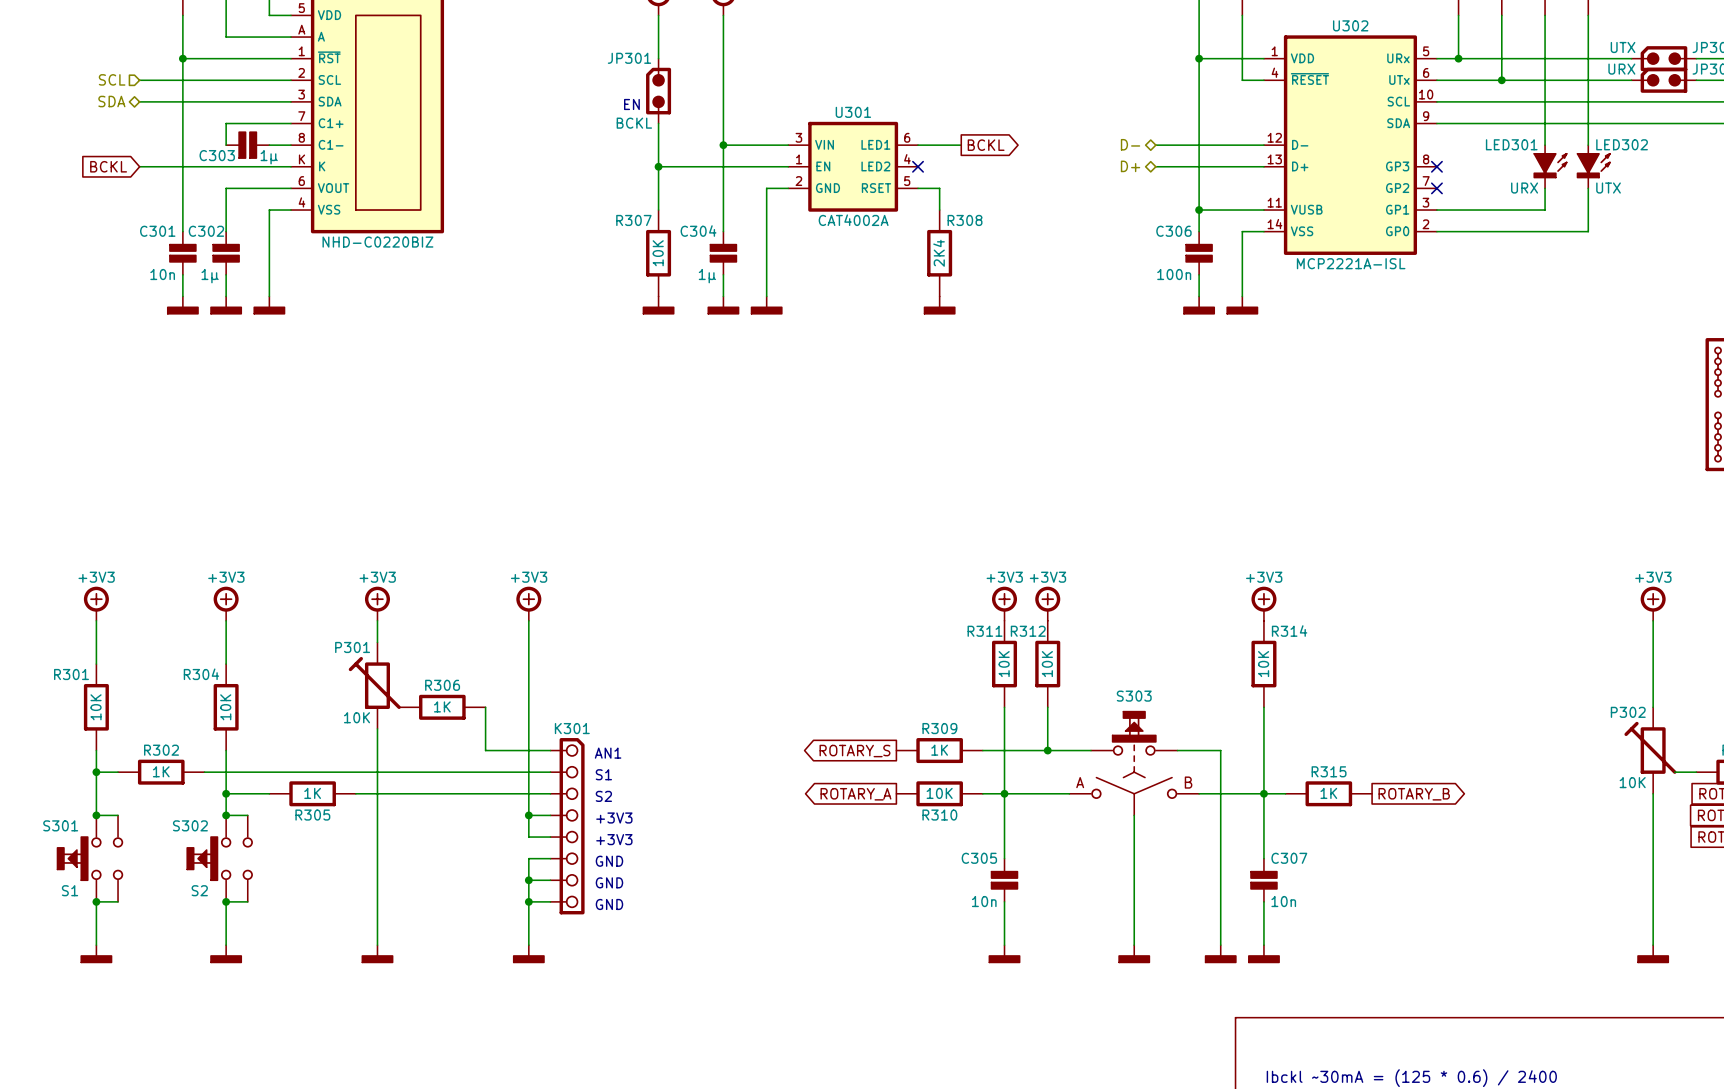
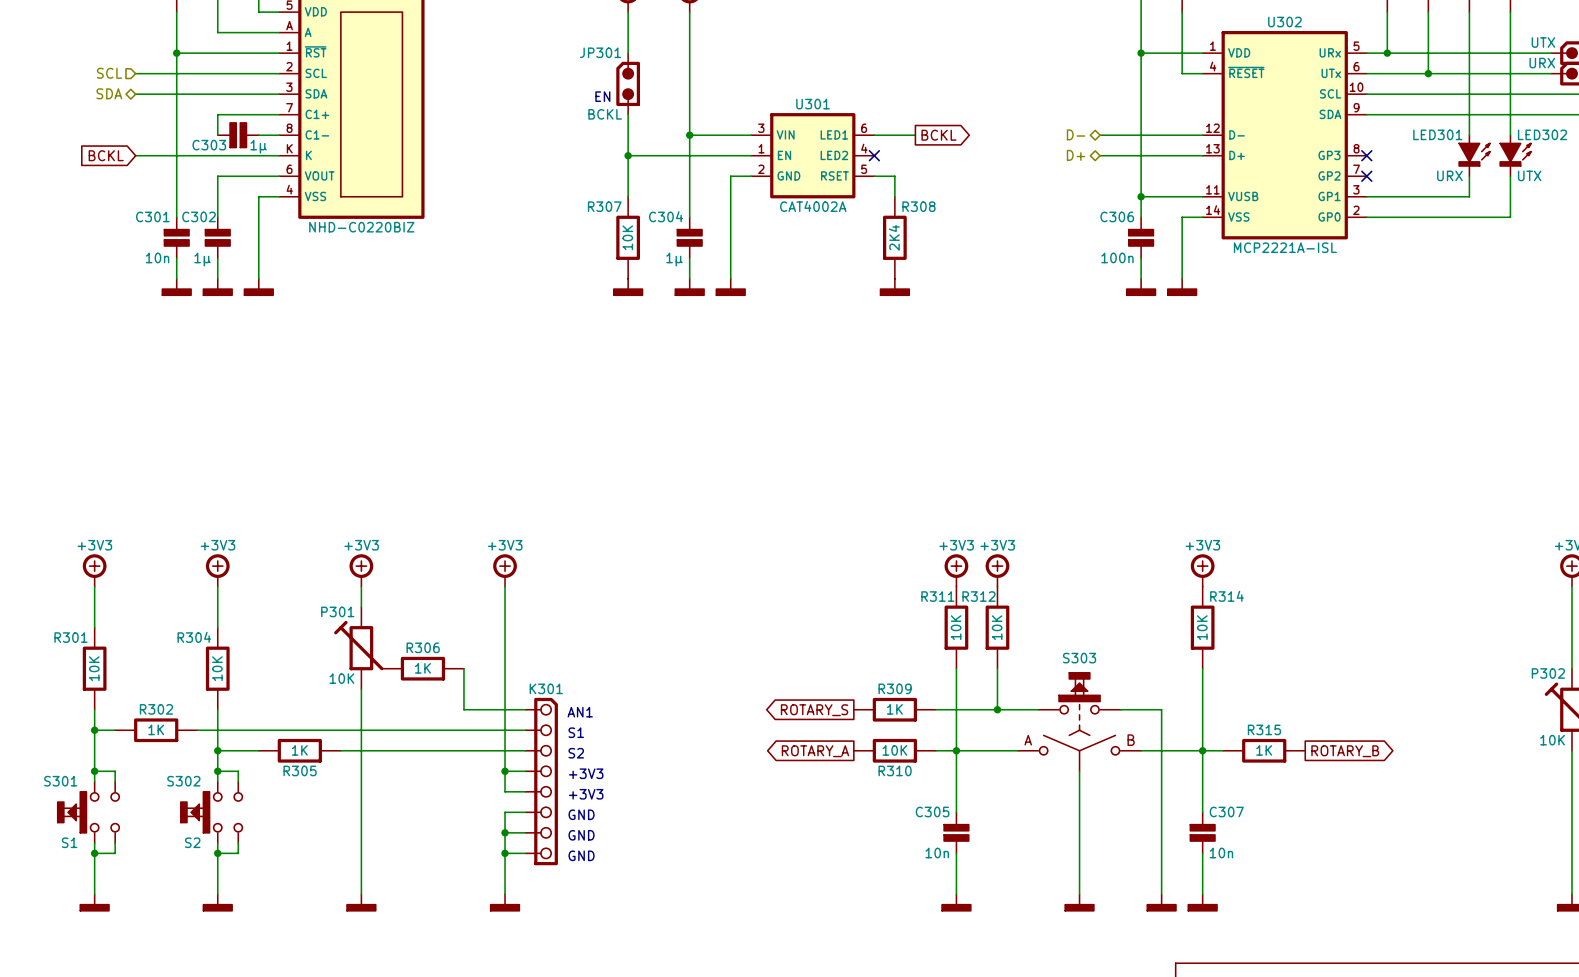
S301 symbol: [57, 815, 124, 902] -> [57, 781, 121, 844]
S302 symbol: [187, 815, 253, 902] -> [180, 781, 244, 844]

